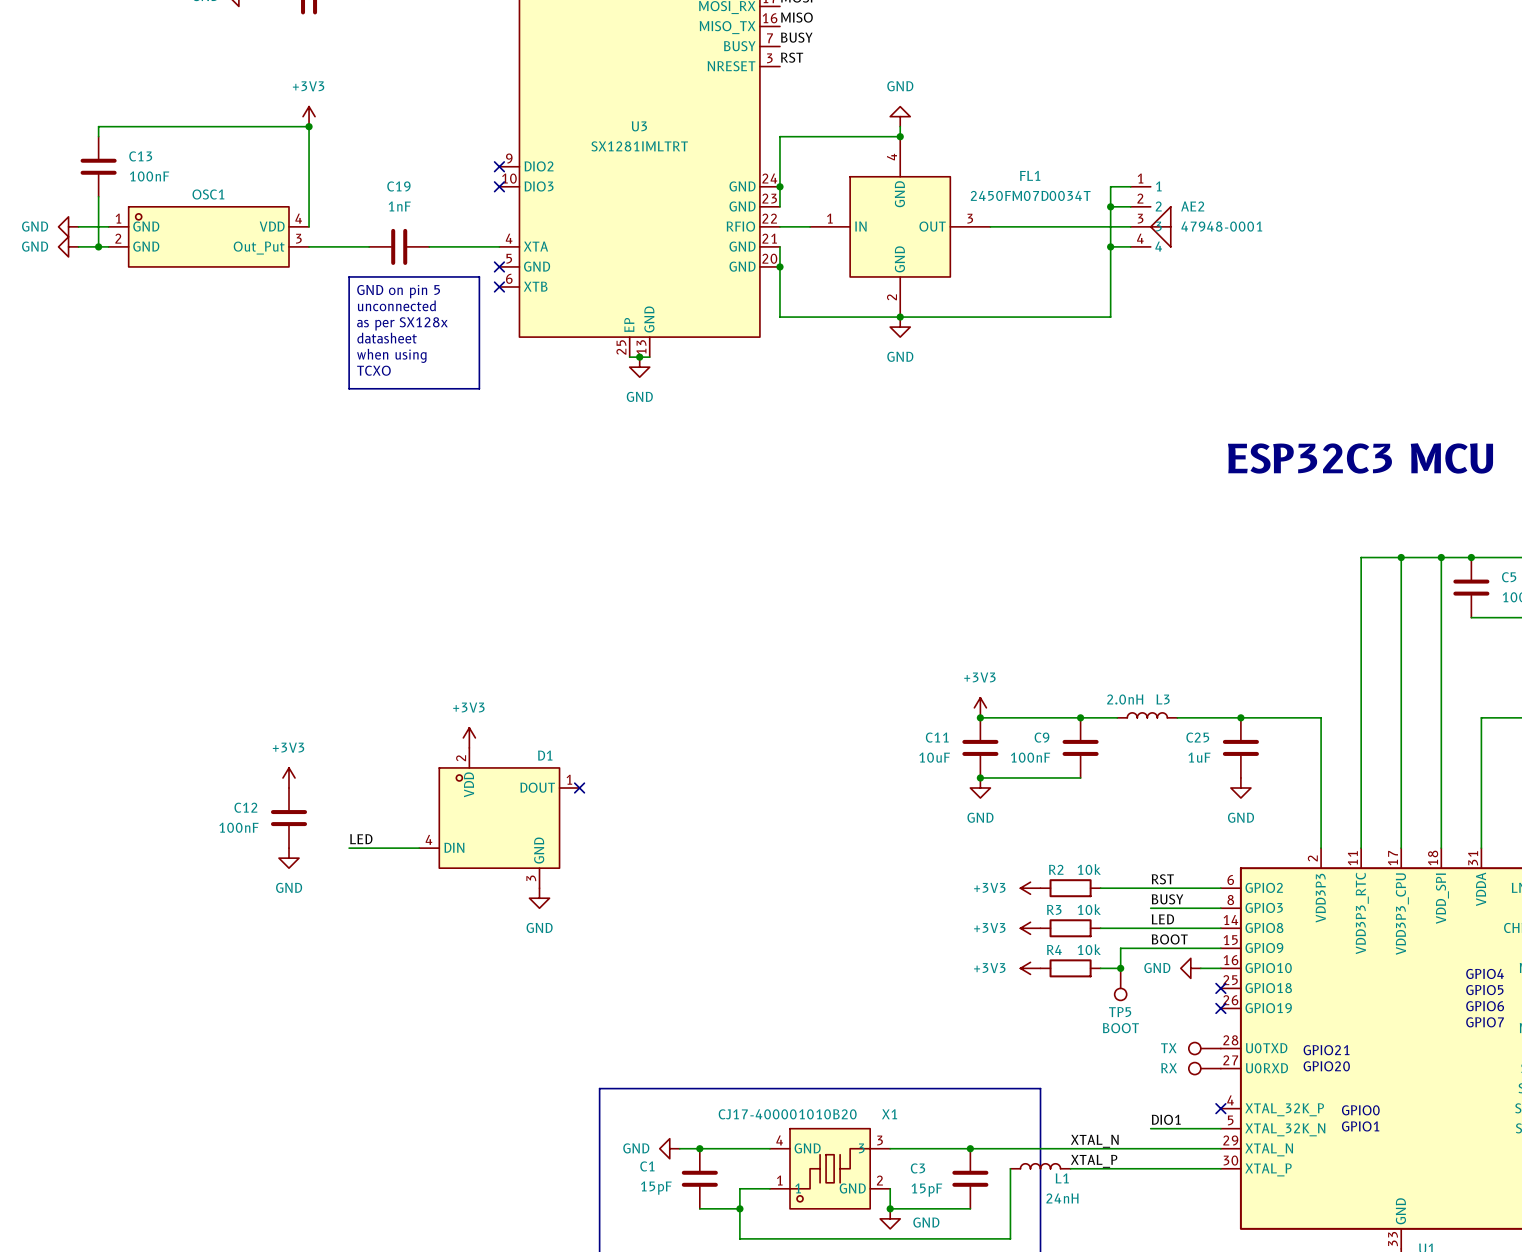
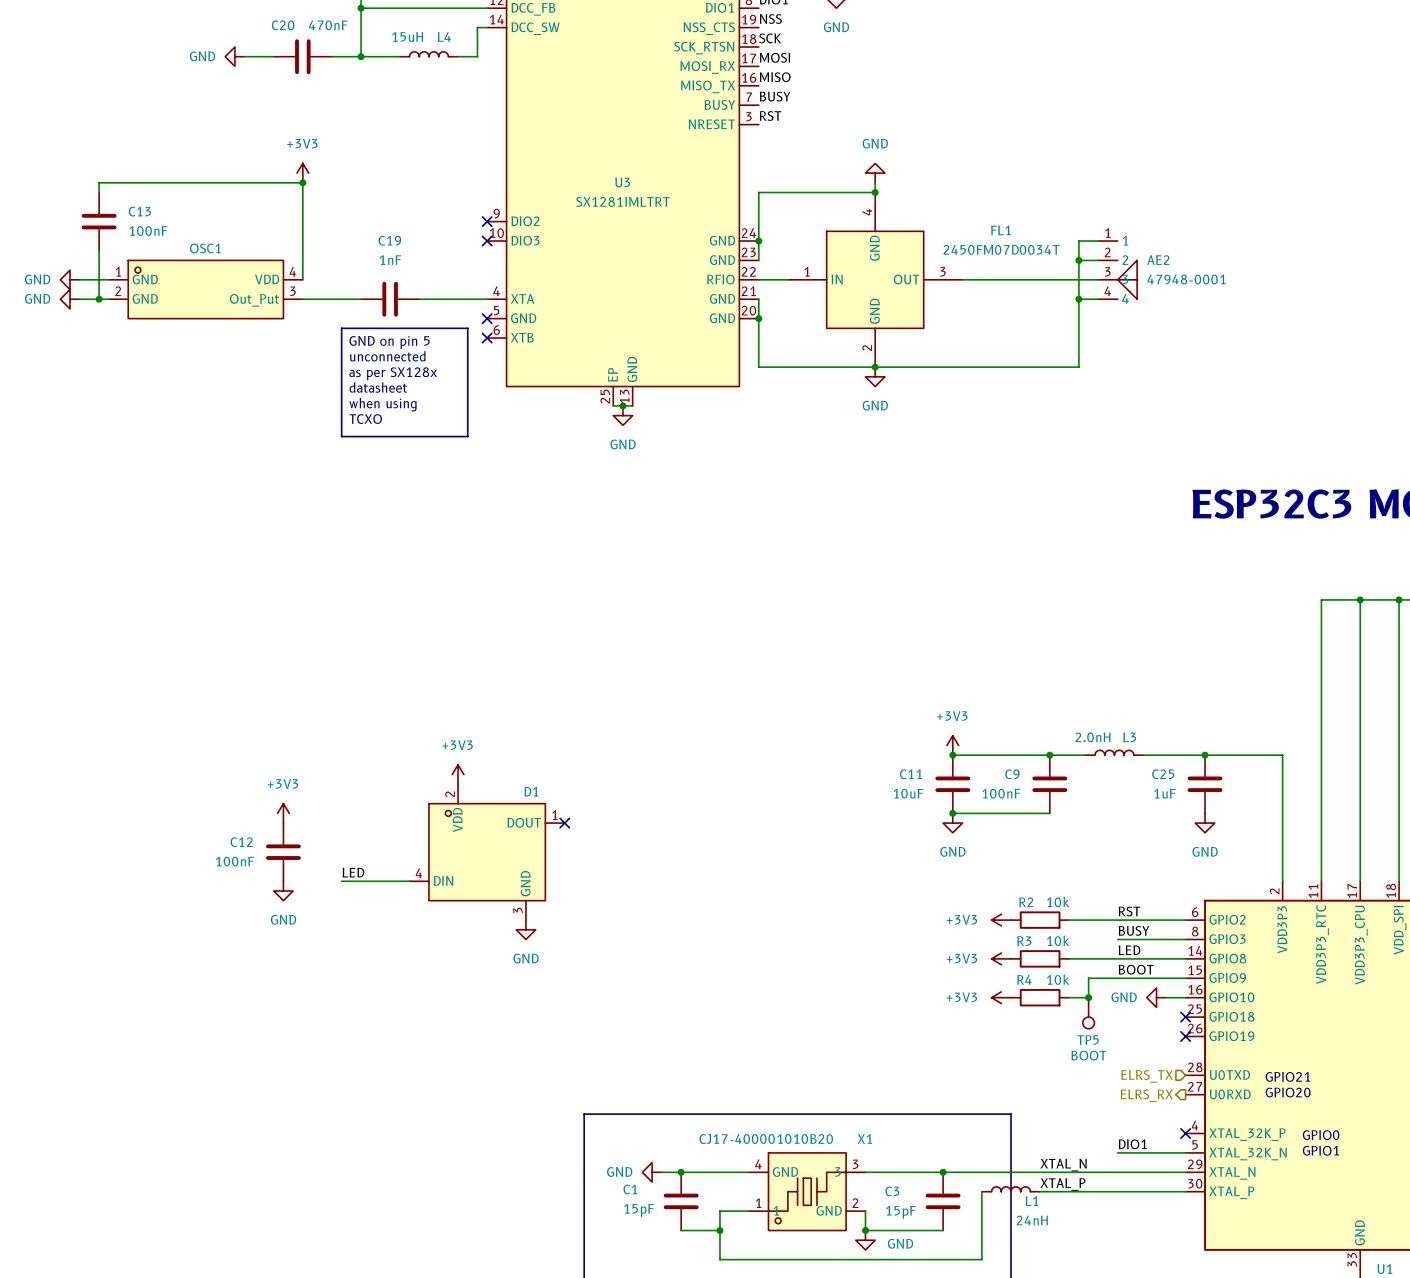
part: TX (1204, 1048) -> none
hierarchical label: none -> ELRS_TX (1147, 1076)
part: RX (1204, 1068) -> none
hierarchical label: none -> ELRS_RX (1146, 1095)

